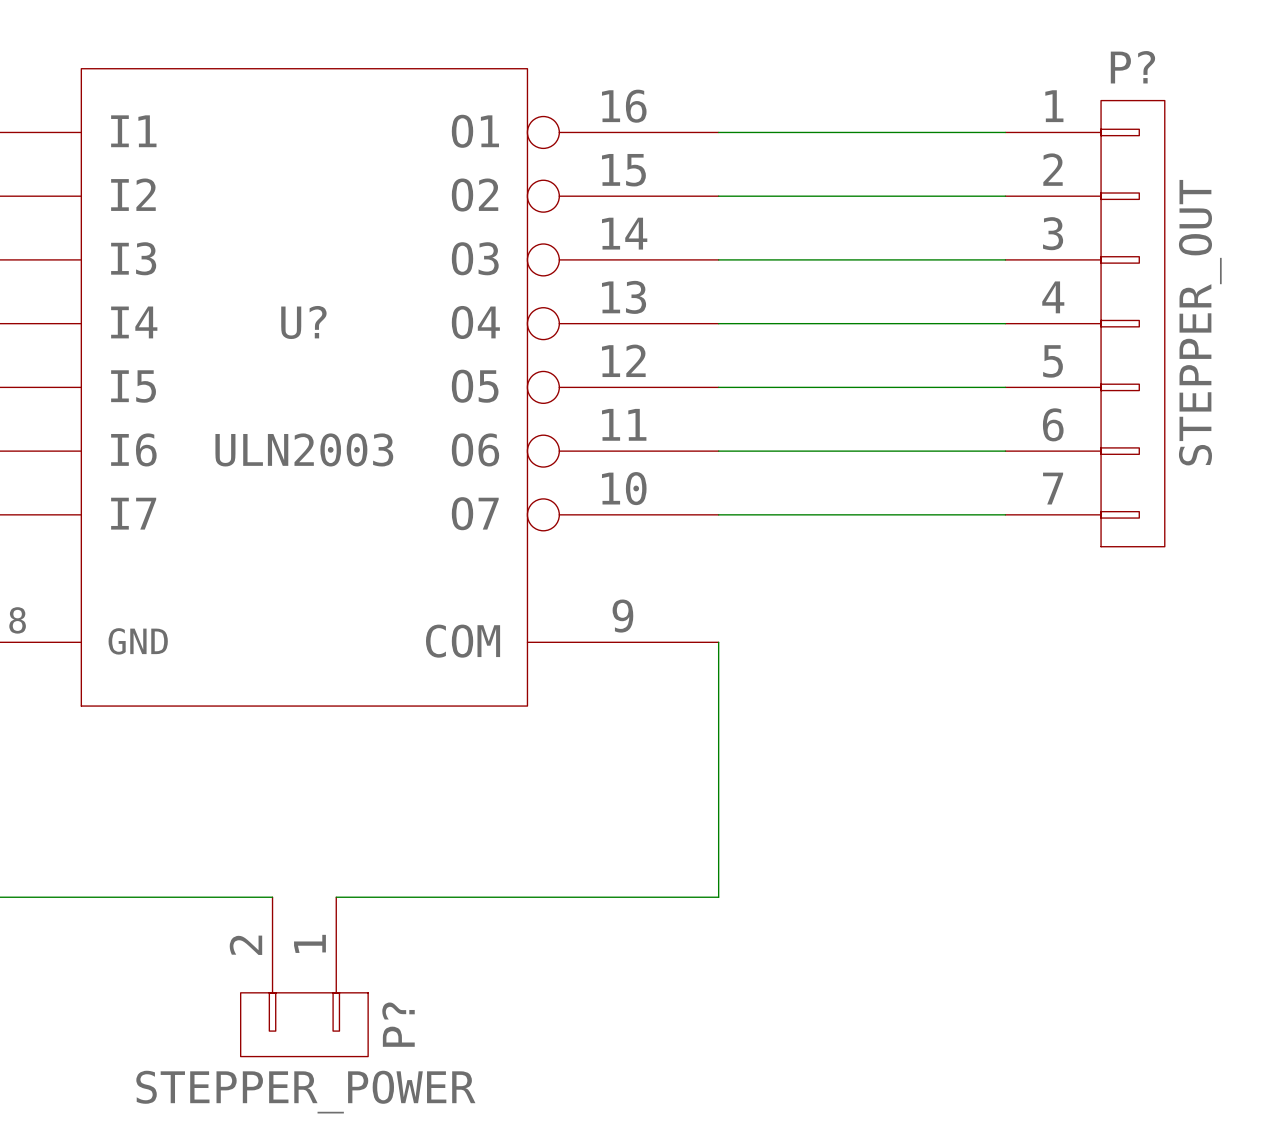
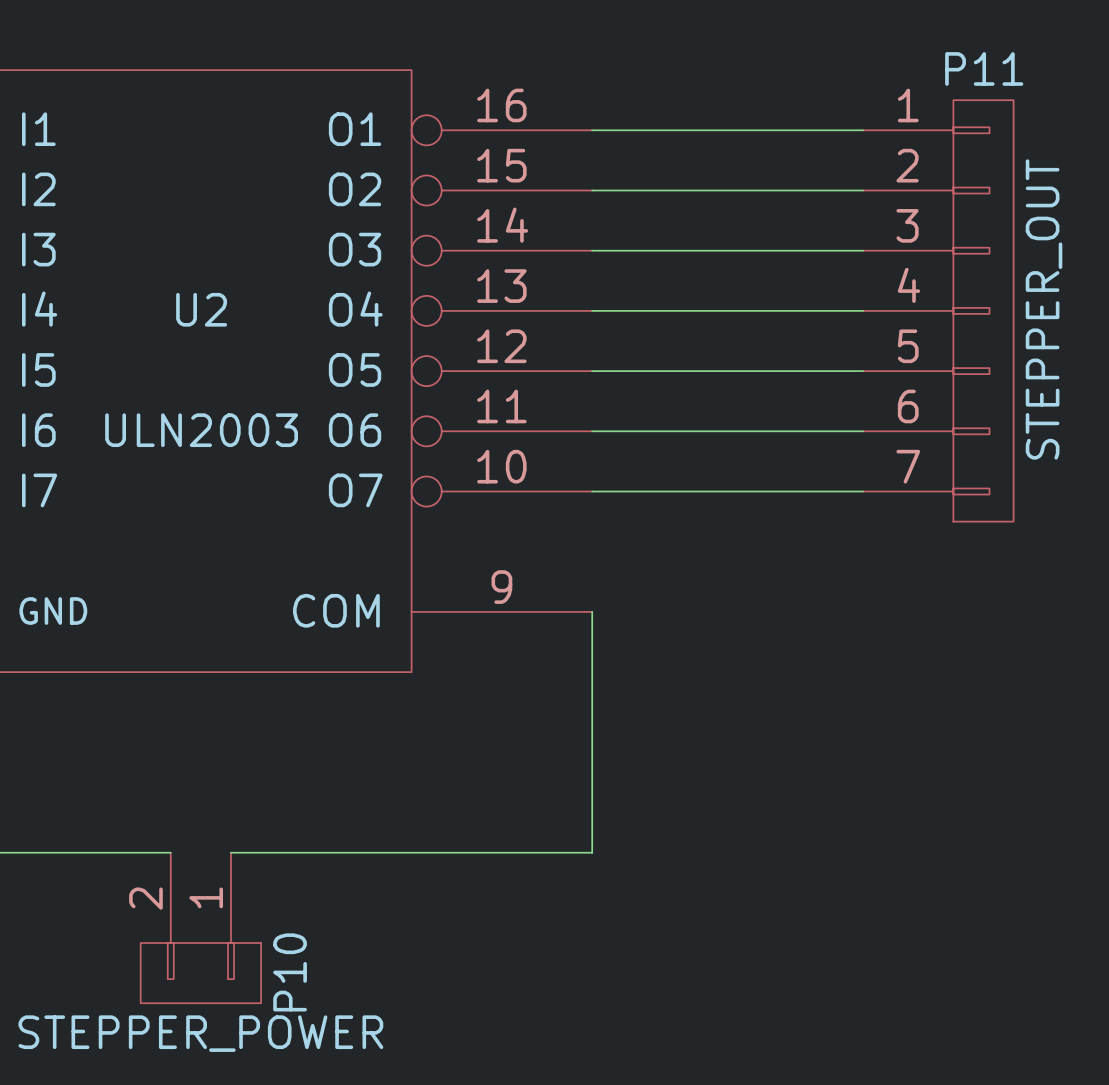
P? name: P? (1132, 67) -> P11 (984, 68)
U? name: U? (303, 322) -> U2 (201, 309)
P? name: P? (398, 1024) -> P10 (290, 972)

